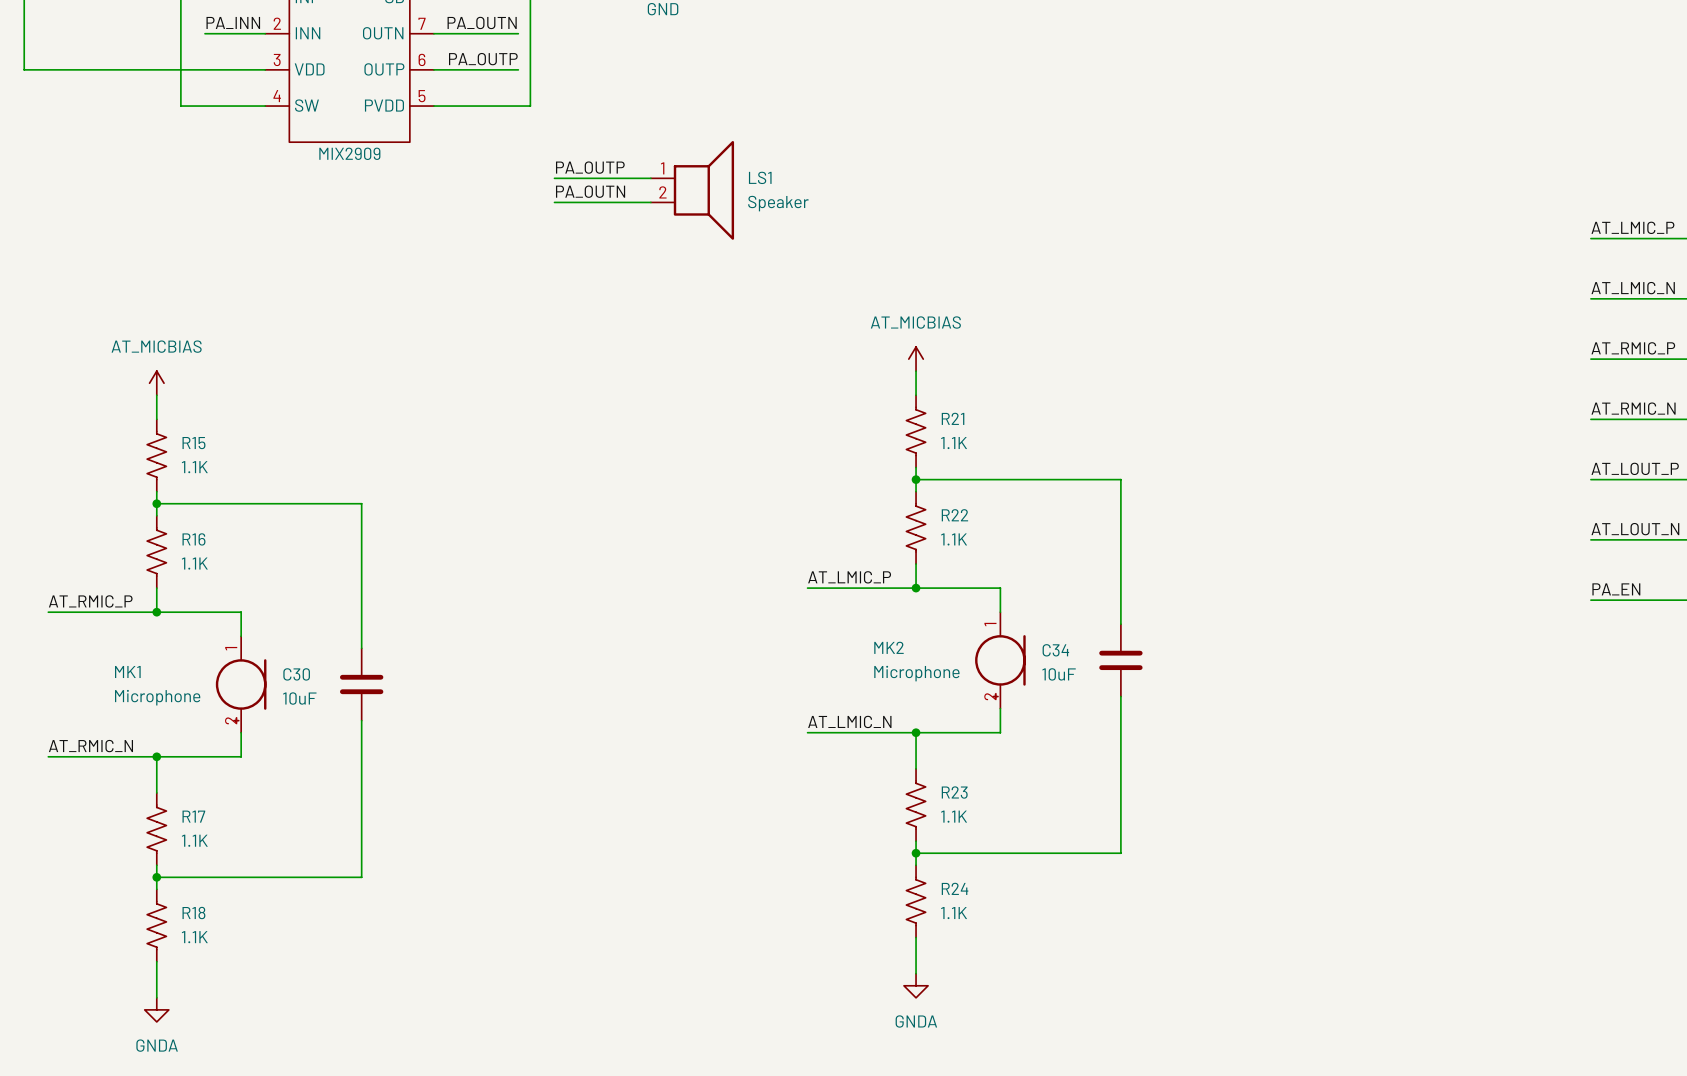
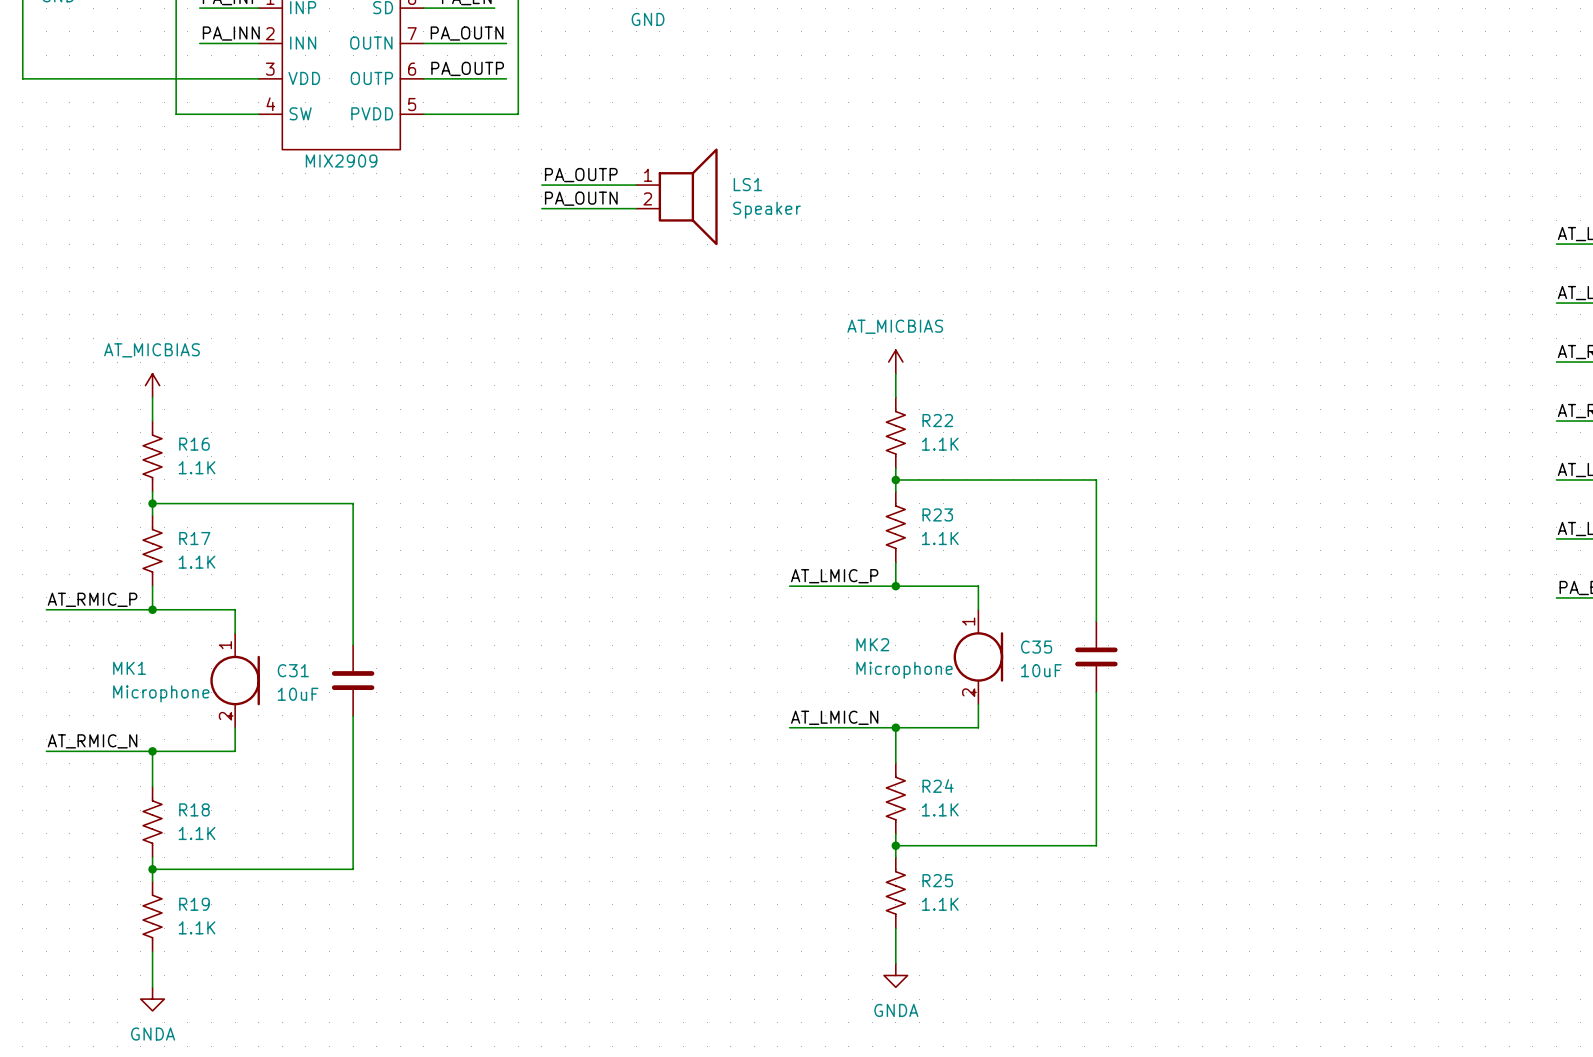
R21 name: R21 (953, 418) -> R22 (937, 420)
R15 name: R15 (193, 443) -> R16 (194, 444)
R22 name: R22 (954, 515) -> R23 (937, 514)
R16 name: R16 (193, 539) -> R17 (194, 538)
C34 name: C34 (1055, 650) -> C35 (1036, 647)
C30 name: C30 (296, 674) -> C31 (293, 670)
R23 name: R23 (954, 792) -> R24 (938, 786)
R17 name: R17 (193, 816) -> R18 (194, 809)
R24 name: R24 (955, 888) -> R25 (937, 880)
R18 name: R18 (193, 913) -> R19 (194, 904)

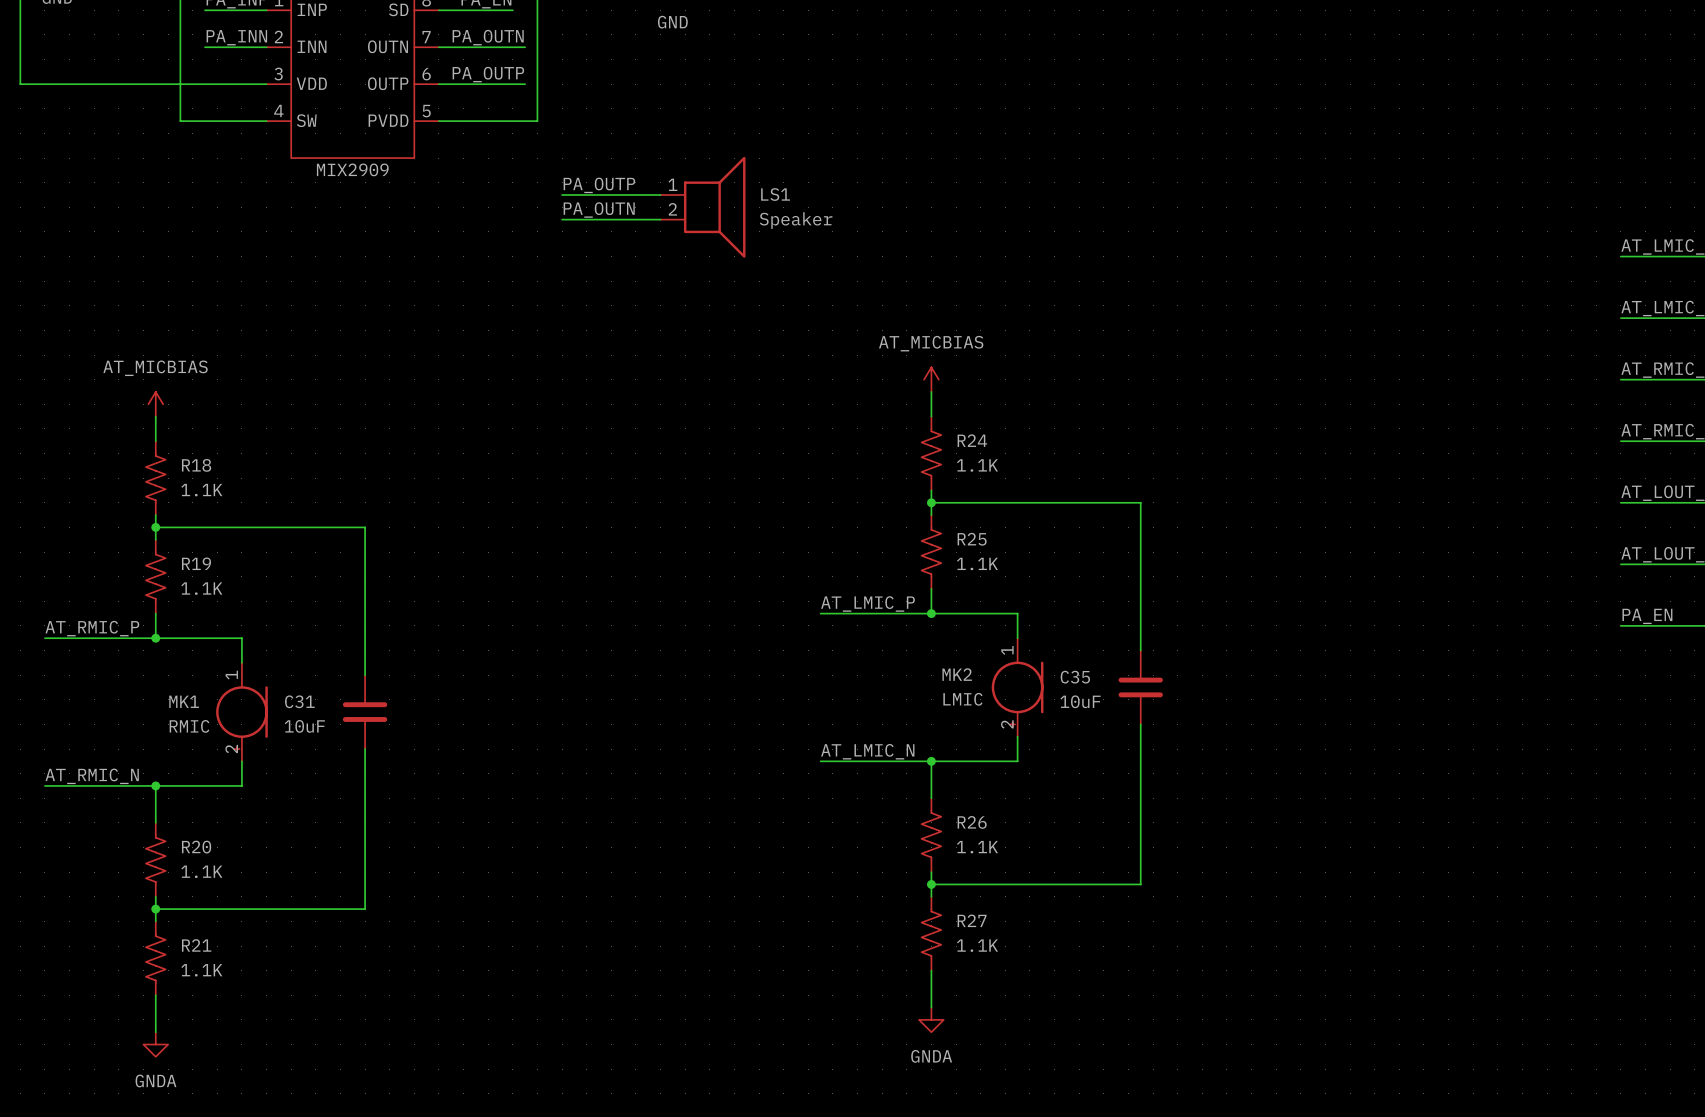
R22 name: R22 (937, 420) -> R24 (972, 440)
R16 name: R16 (194, 444) -> R18 (196, 465)
R23 name: R23 (937, 514) -> R25 (972, 539)
R17 name: R17 (194, 538) -> R19 (196, 563)
MK2 name position: MK2 (872, 644) -> MK2 (957, 674)
MK1 name position: MK1 (129, 668) -> MK1 (184, 701)
MK2 value: Microphone (904, 670) -> LMIC (962, 699)
MK1 value: Microphone (161, 693) -> RMIC (189, 726)
R24 name: R24 (938, 786) -> R26 (972, 822)
R18 name: R18 (194, 809) -> R20 (196, 847)
R25 name: R25 (937, 880) -> R27 (972, 920)
R19 name: R19 (194, 904) -> R21 (196, 945)

